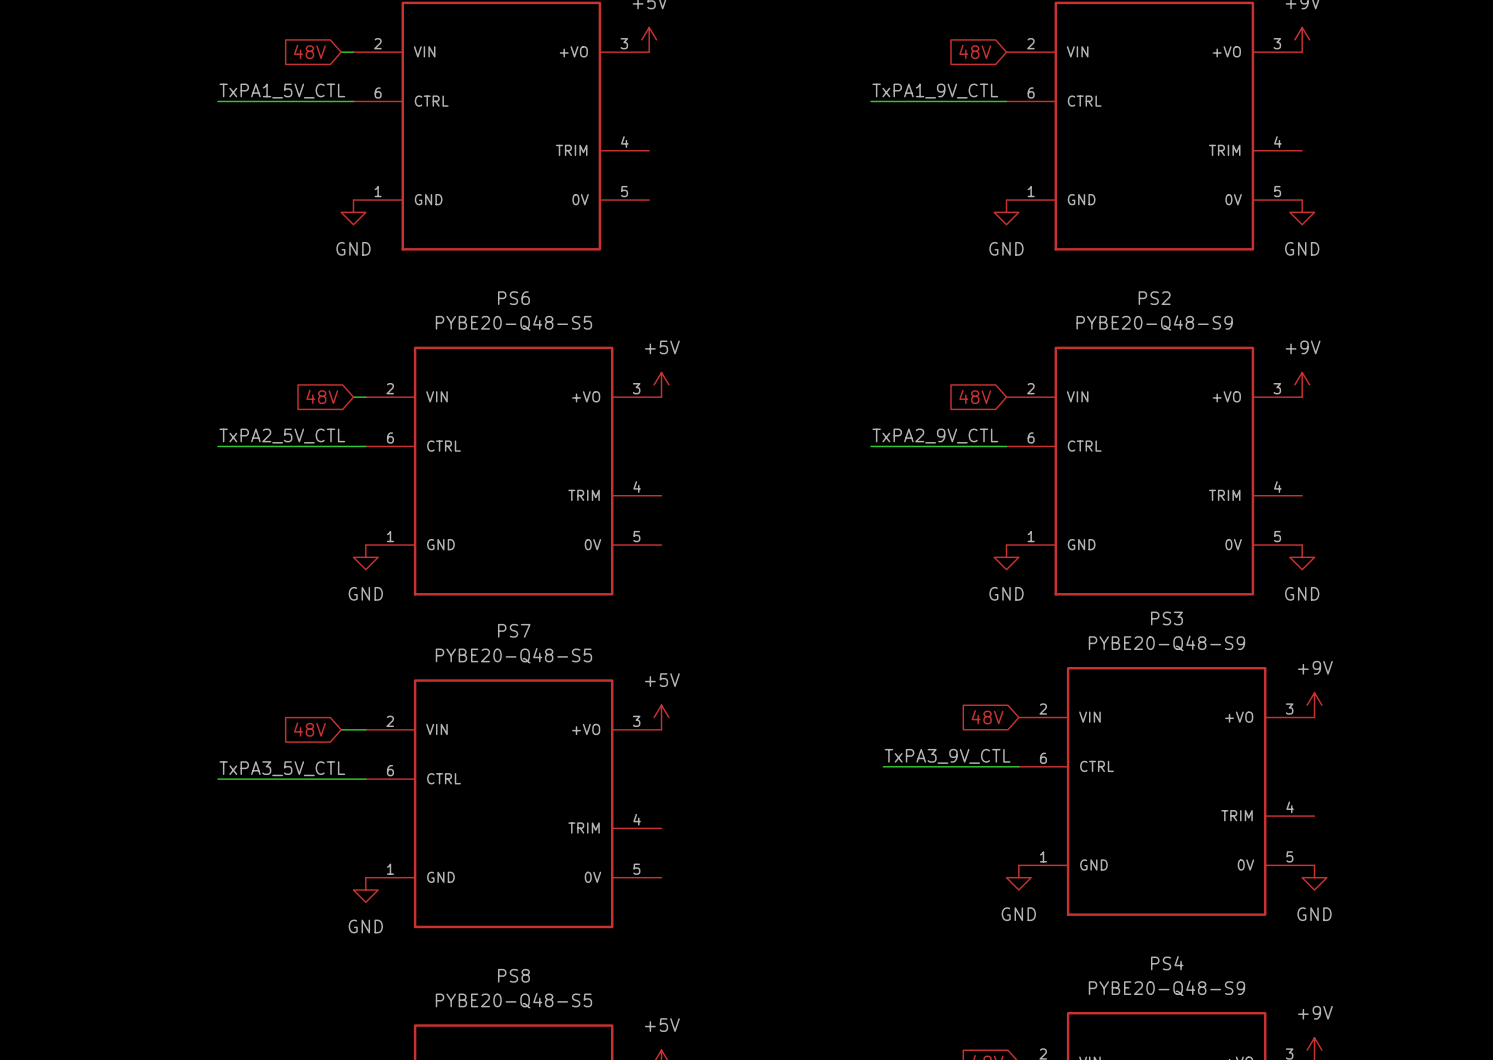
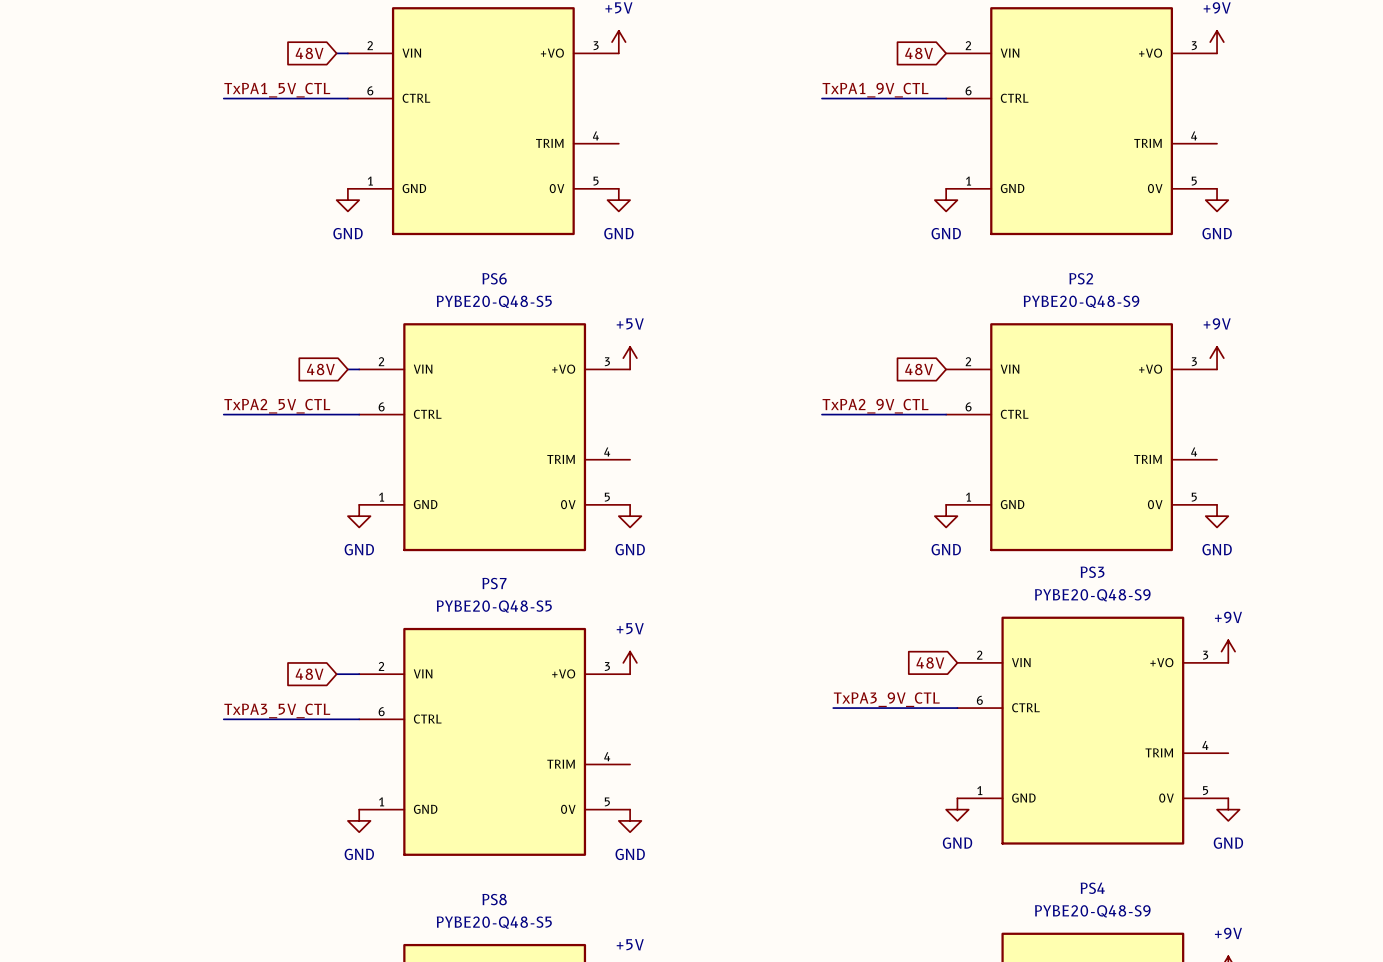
power symbol: none -> GND (618, 200)
power symbol: none -> GND (630, 516)
power symbol: none -> GND (630, 820)

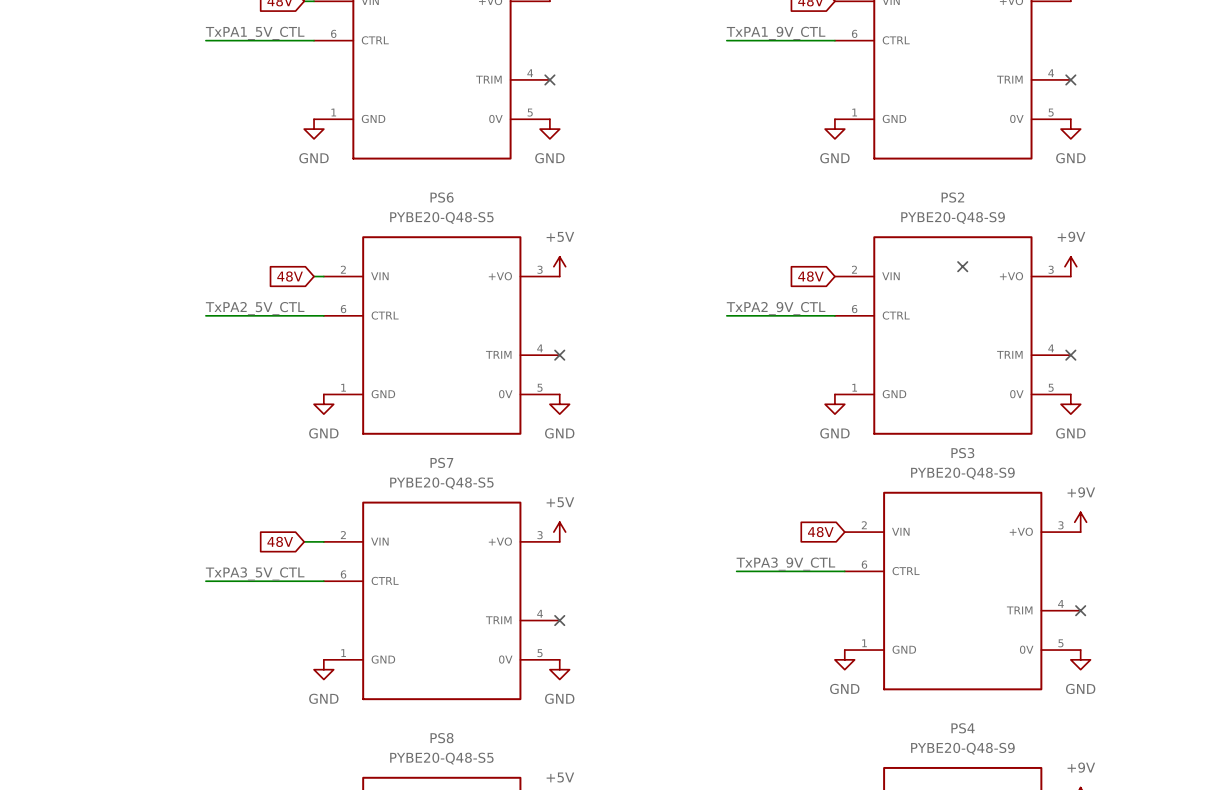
no-connect mark: none -> (549, 79)
no-connect mark: none -> (1070, 79)
no-connect mark: none -> (962, 266)
no-connect mark: none -> (559, 355)
no-connect mark: none -> (1070, 355)
no-connect mark: none -> (1080, 610)
no-connect mark: none -> (559, 620)

